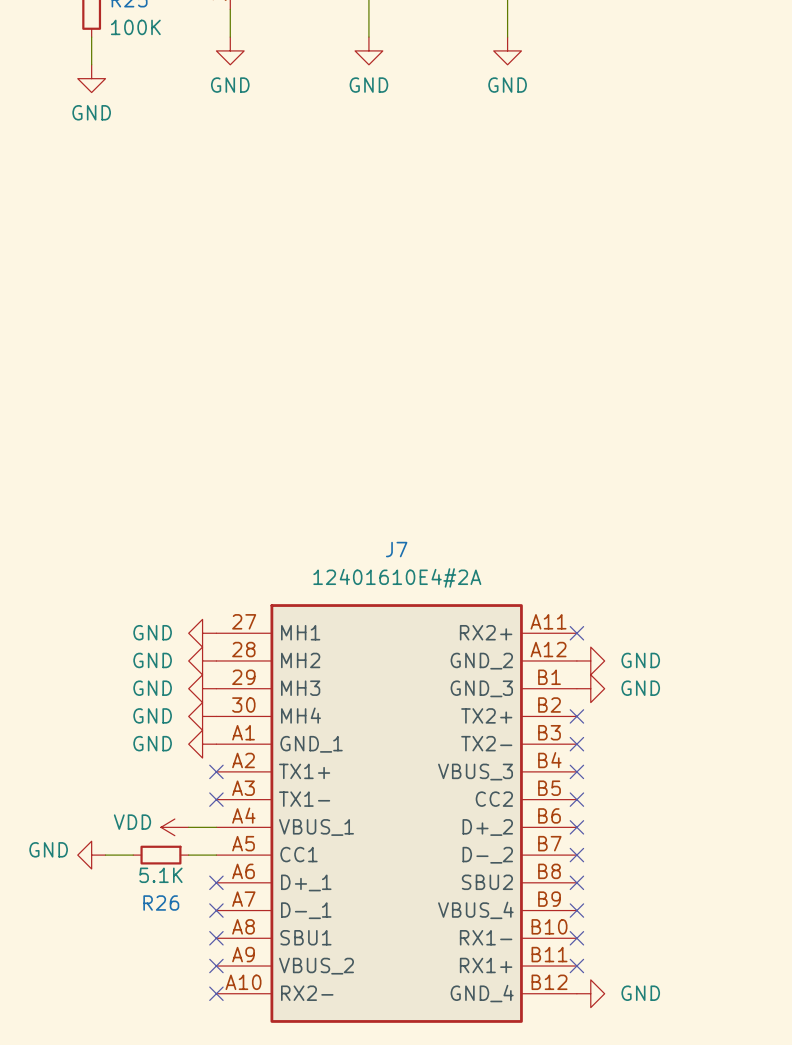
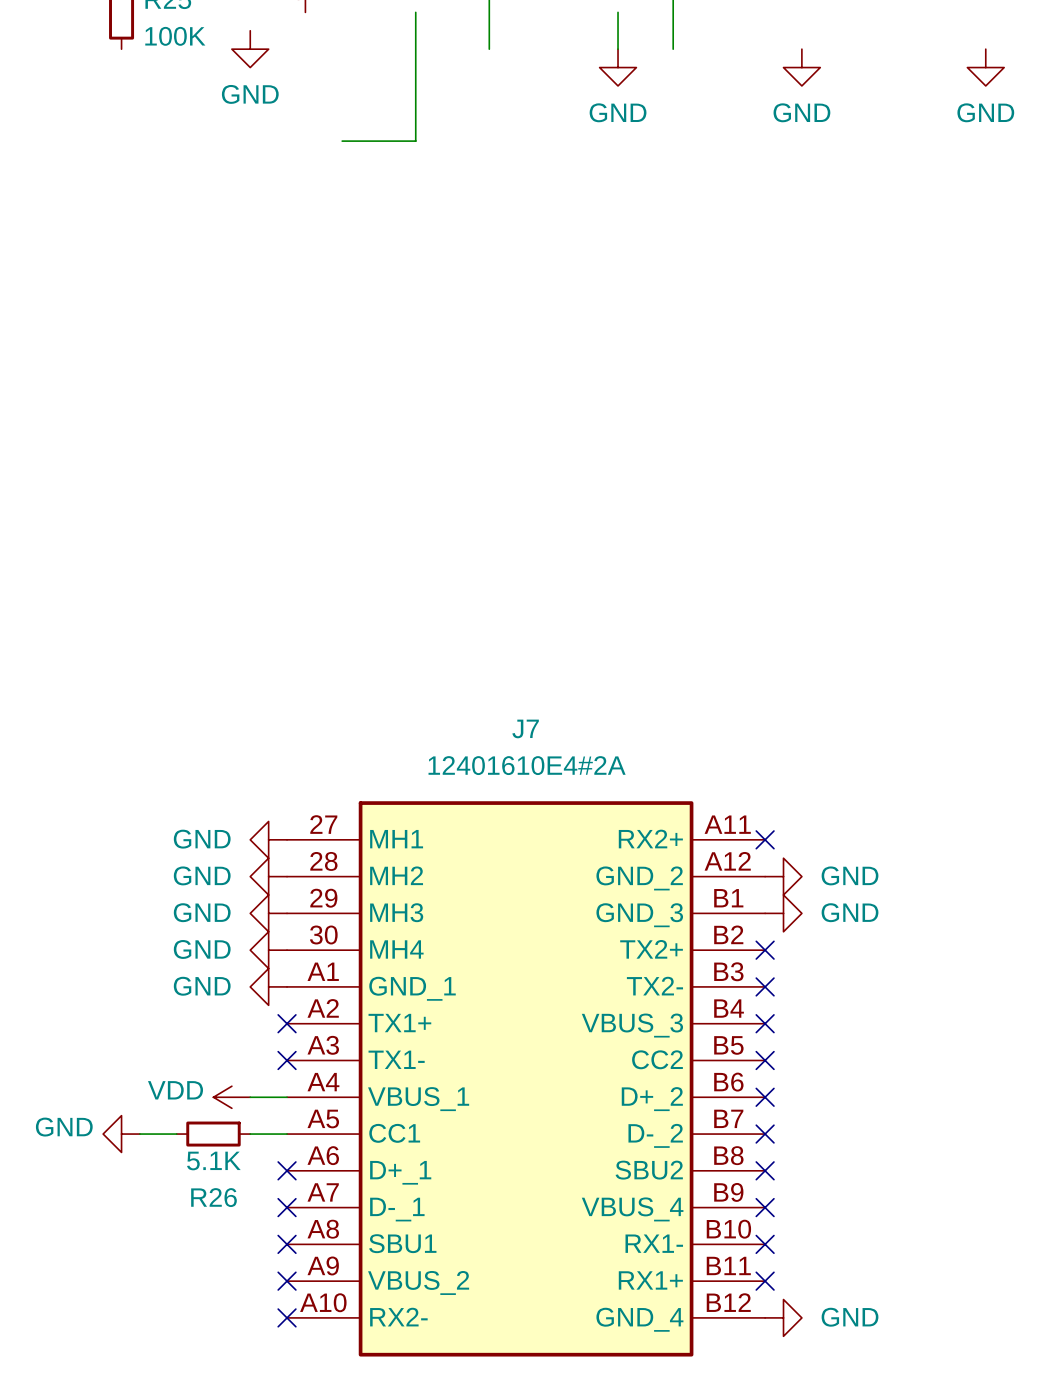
wire: (230, 9) (230, 37) -> (618, 12) (618, 49)
wire: none -> (415, 12) (415, 141) (342, 141)
wire: (91, 37) (91, 64) -> none
power symbol position: GND (230, 50) -> GND (250, 49)
power symbol: GND (368, 50) -> none
power symbol position: GND (507, 50) -> GND (618, 67)
power symbol: none -> GND (801, 67)
power symbol: none -> GND (985, 67)
power symbol: GND (91, 78) -> none

